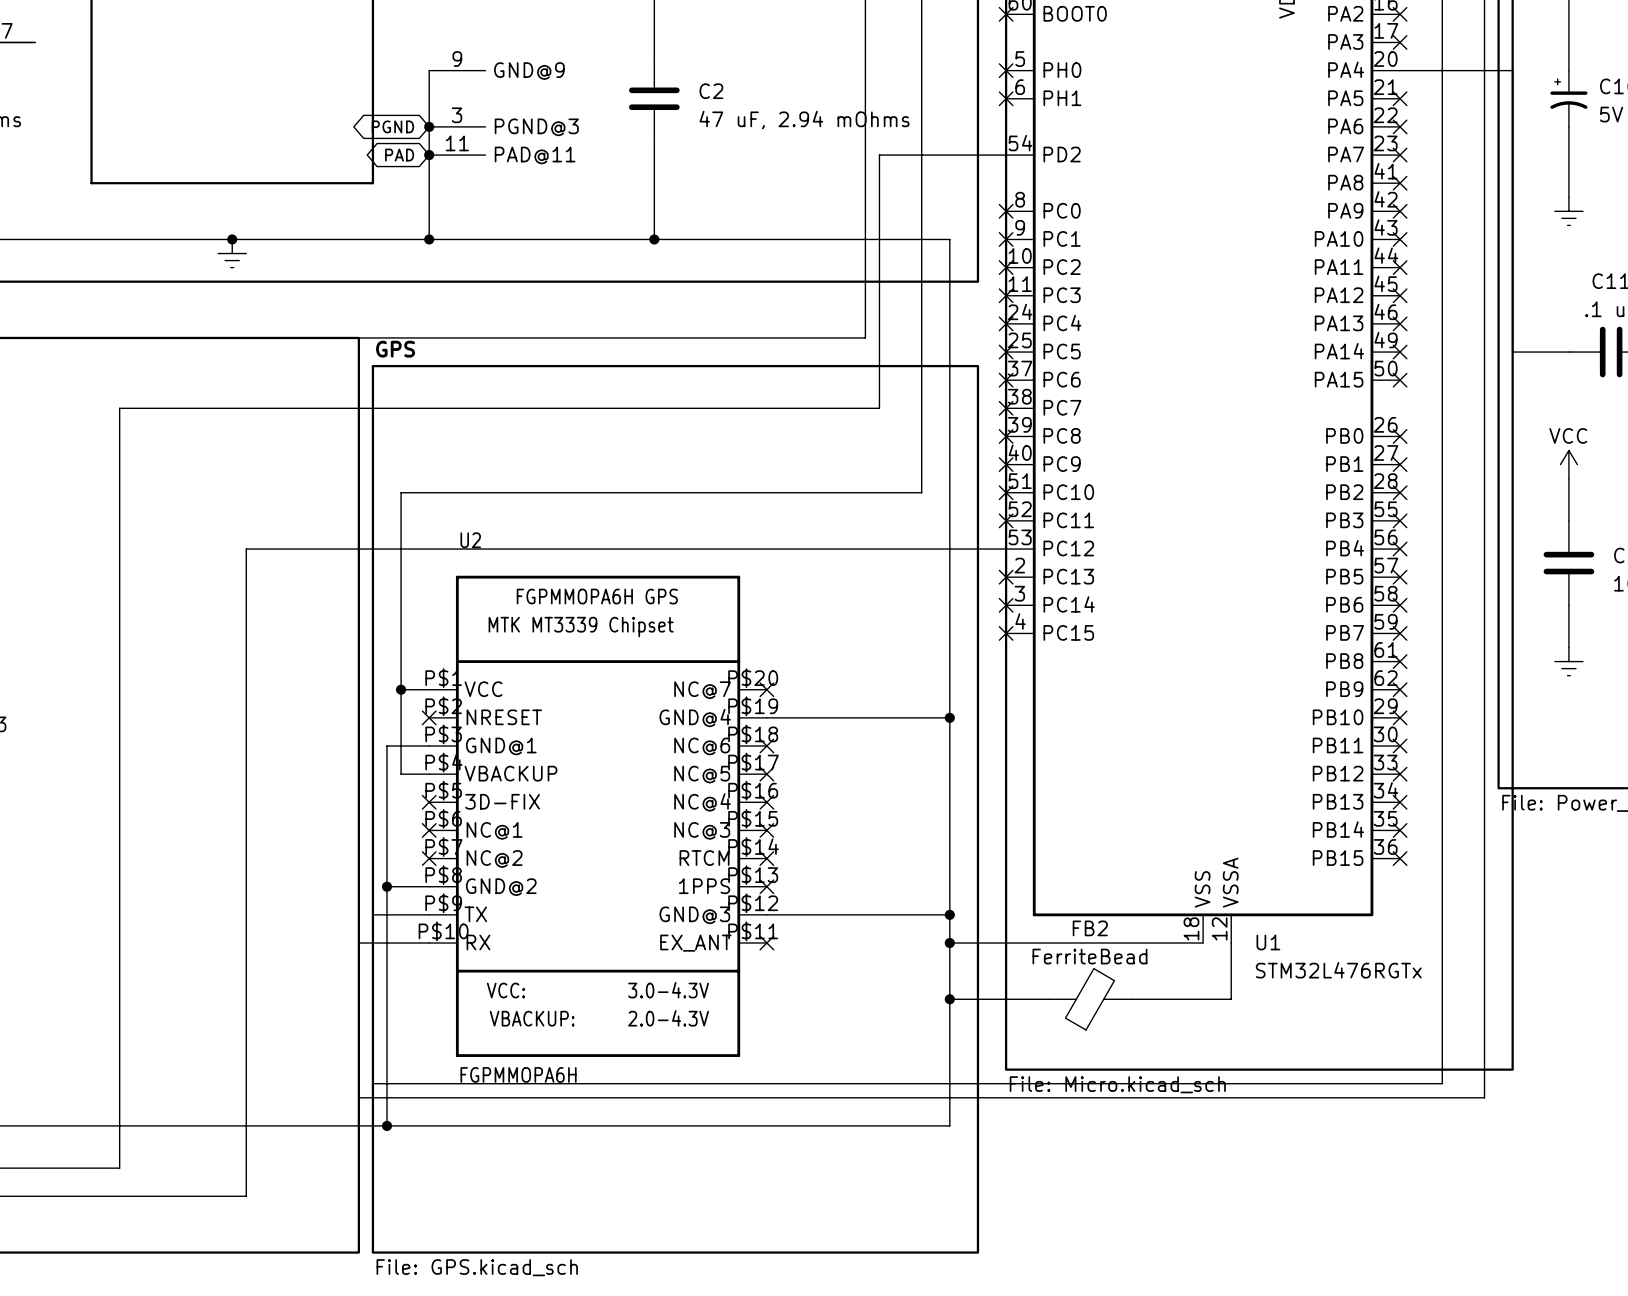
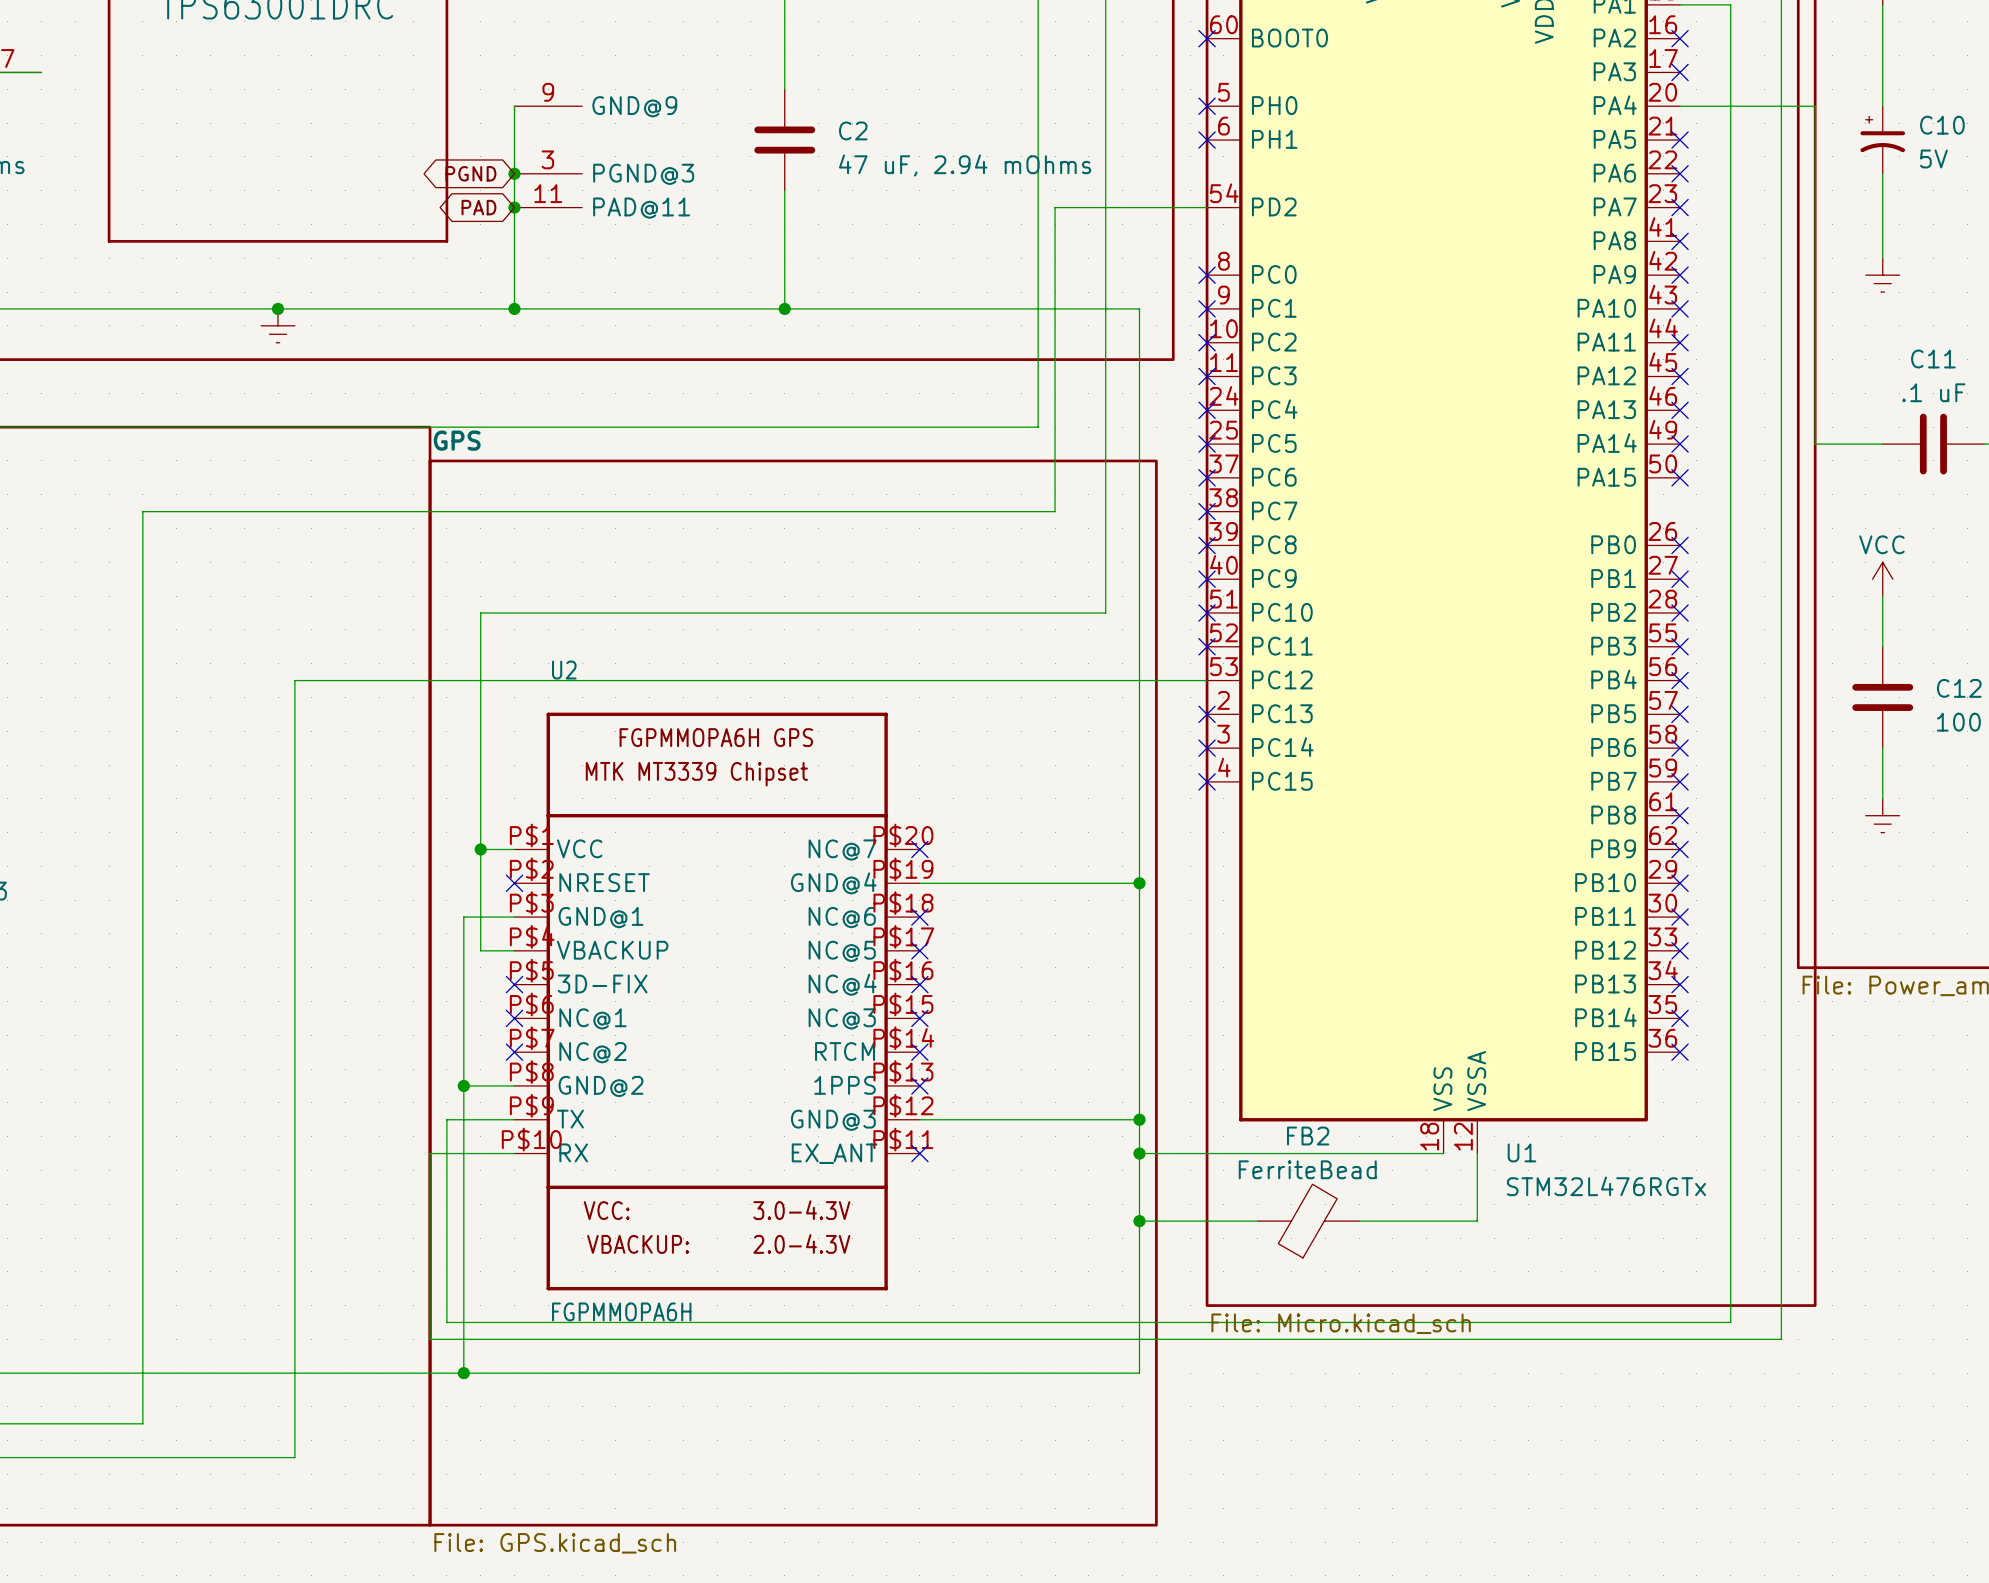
sheet GPS position: (675, 809) -> (793, 993)

